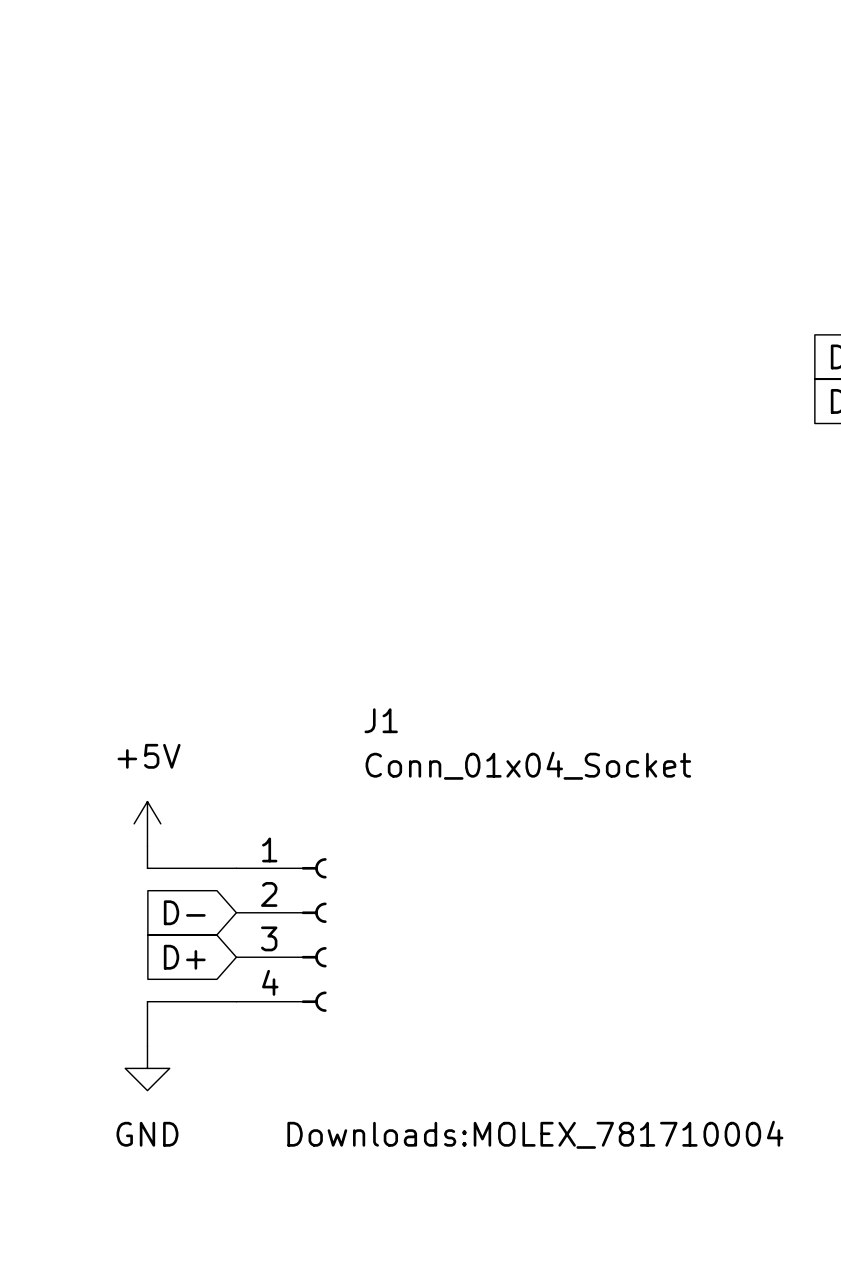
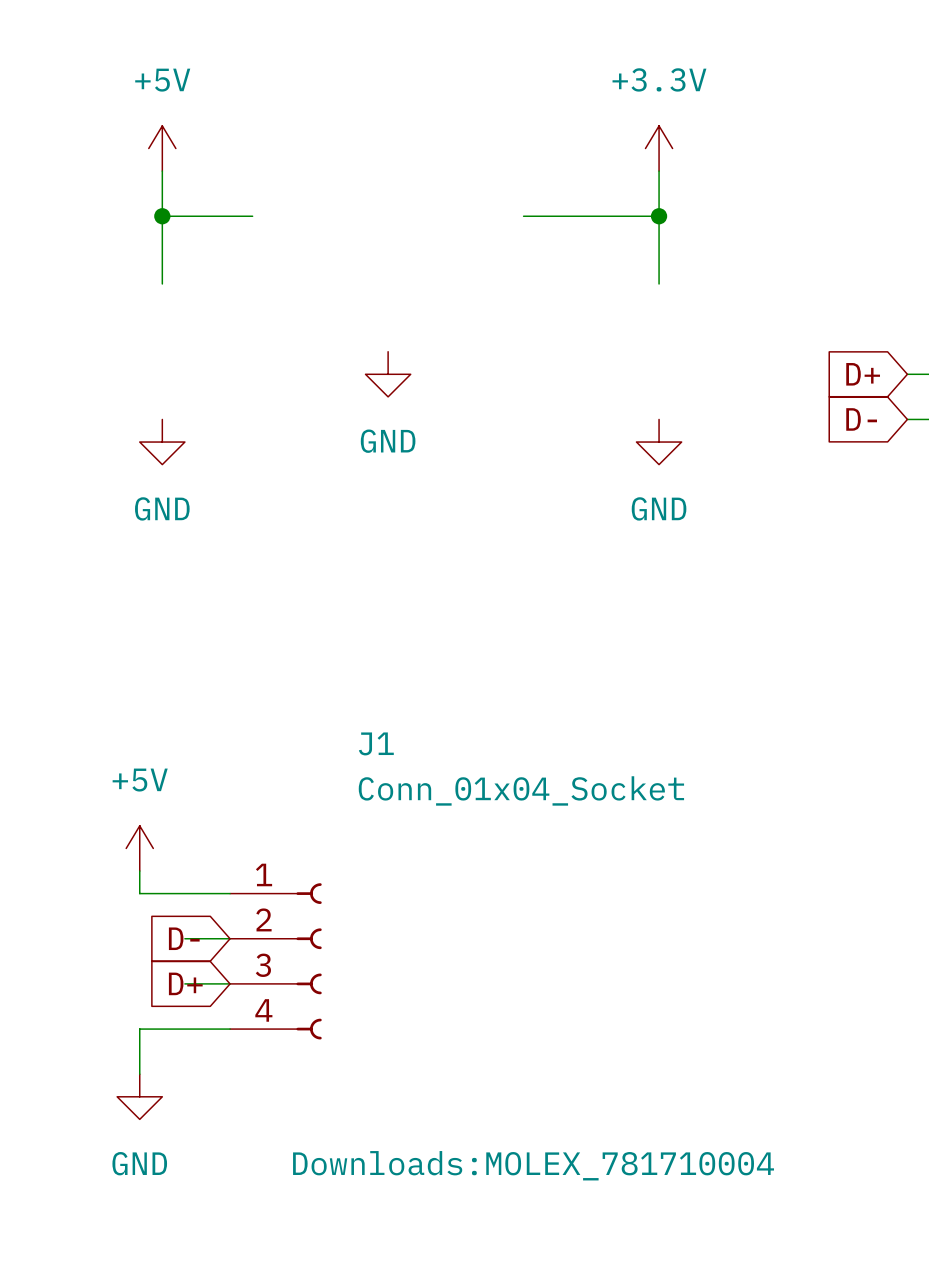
power symbol: none -> +5V (162, 148)
power symbol: none -> +3.3V (659, 148)
wire: none -> (162, 171) (162, 283)
wire: none -> (659, 171) (659, 283)
wire: none -> (162, 216) (252, 216)
junction: none -> (162, 216)
wire: none -> (523, 216) (659, 216)
junction: none -> (659, 216)
power symbol: none -> GND (388, 374)
power symbol: none -> GND (162, 442)
power symbol: none -> GND (659, 442)
wire: none -> (184, 938) (230, 938)
wire: none -> (184, 983) (230, 983)

